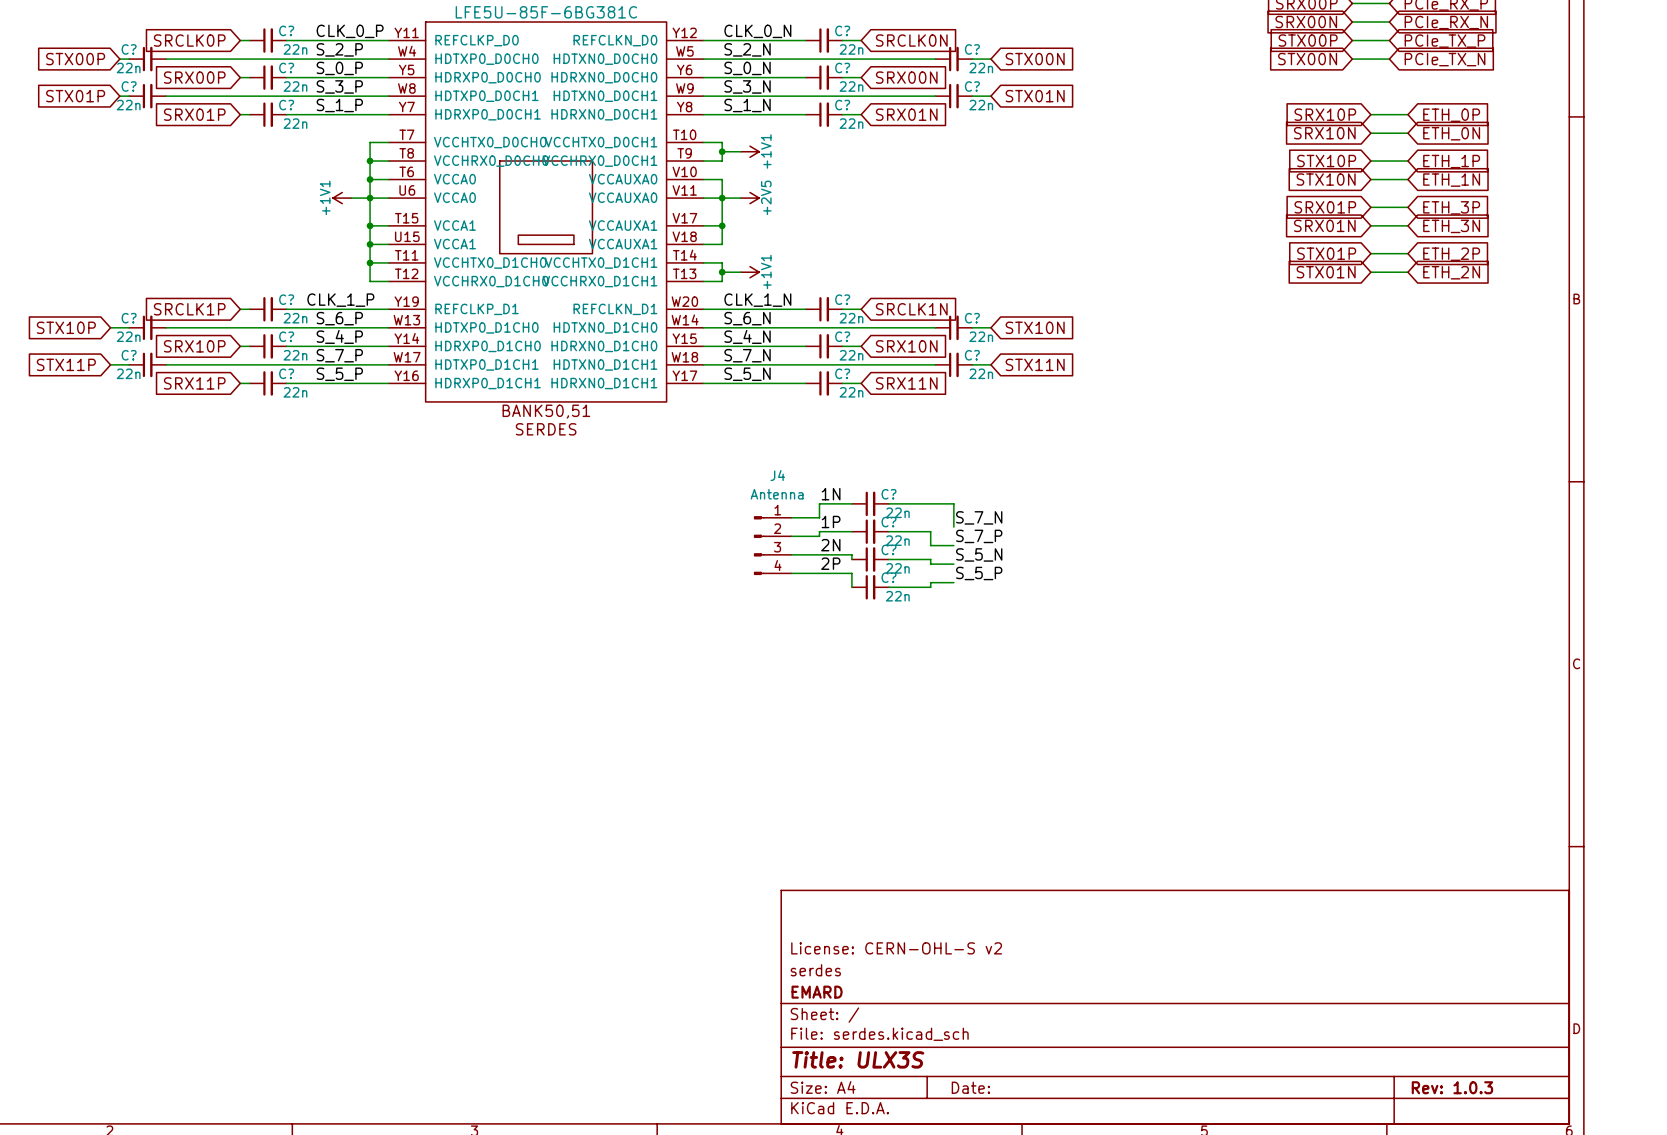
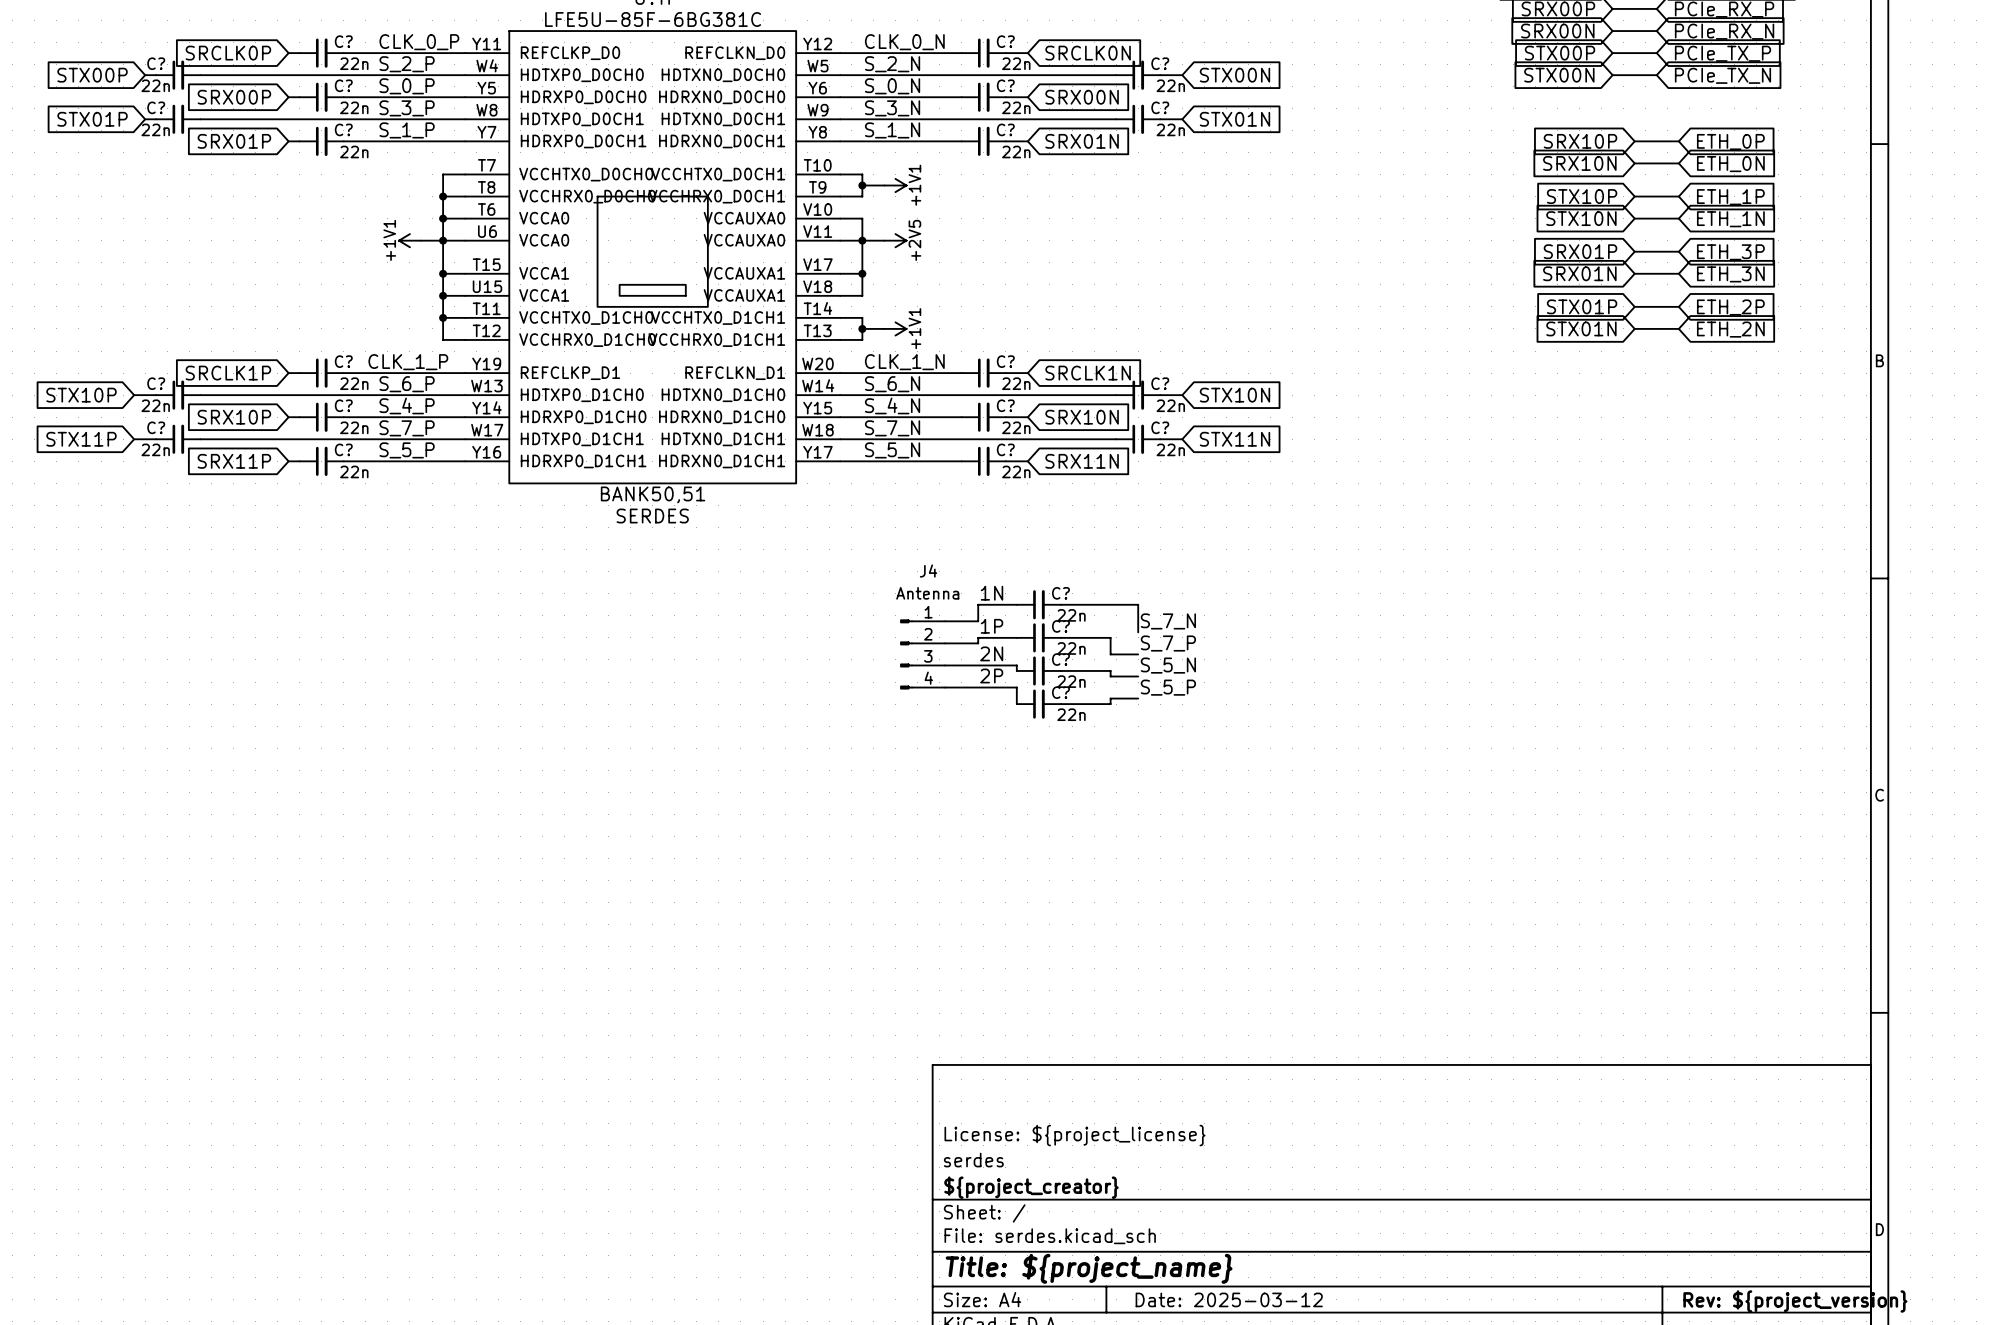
title block: License: CERN-OHL-S v2 (896, 948) -> License: ${project_license} (1075, 1135)
title block: EMARD (817, 992) -> ${project_creator} (1031, 1187)
title block: Title: ULX3S (858, 1059) -> Title: ${project_name} (1089, 1268)
title block: Date: (970, 1087) -> Date: 2025-03-12 (1229, 1299)
title block: Rev: 1.0.3 (1452, 1087) -> Rev: ${project_version} (1795, 1301)

